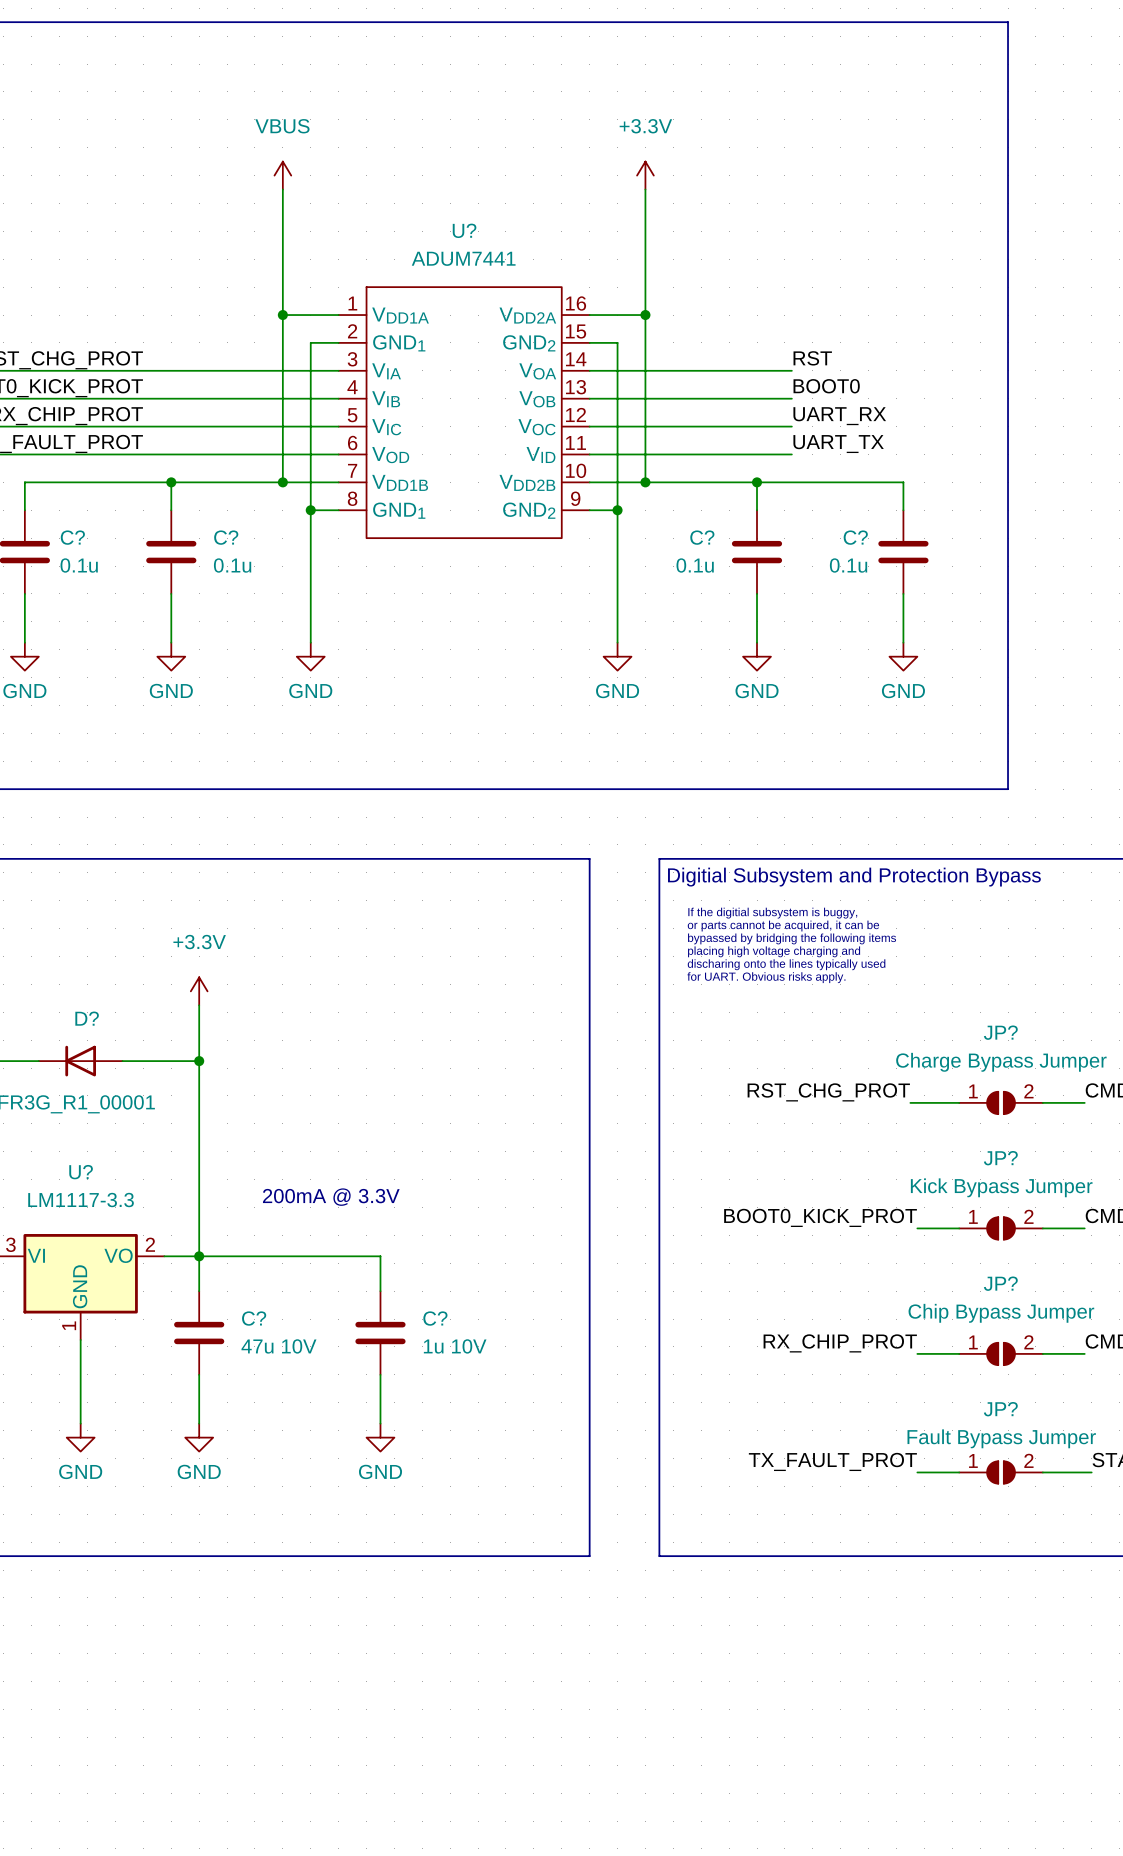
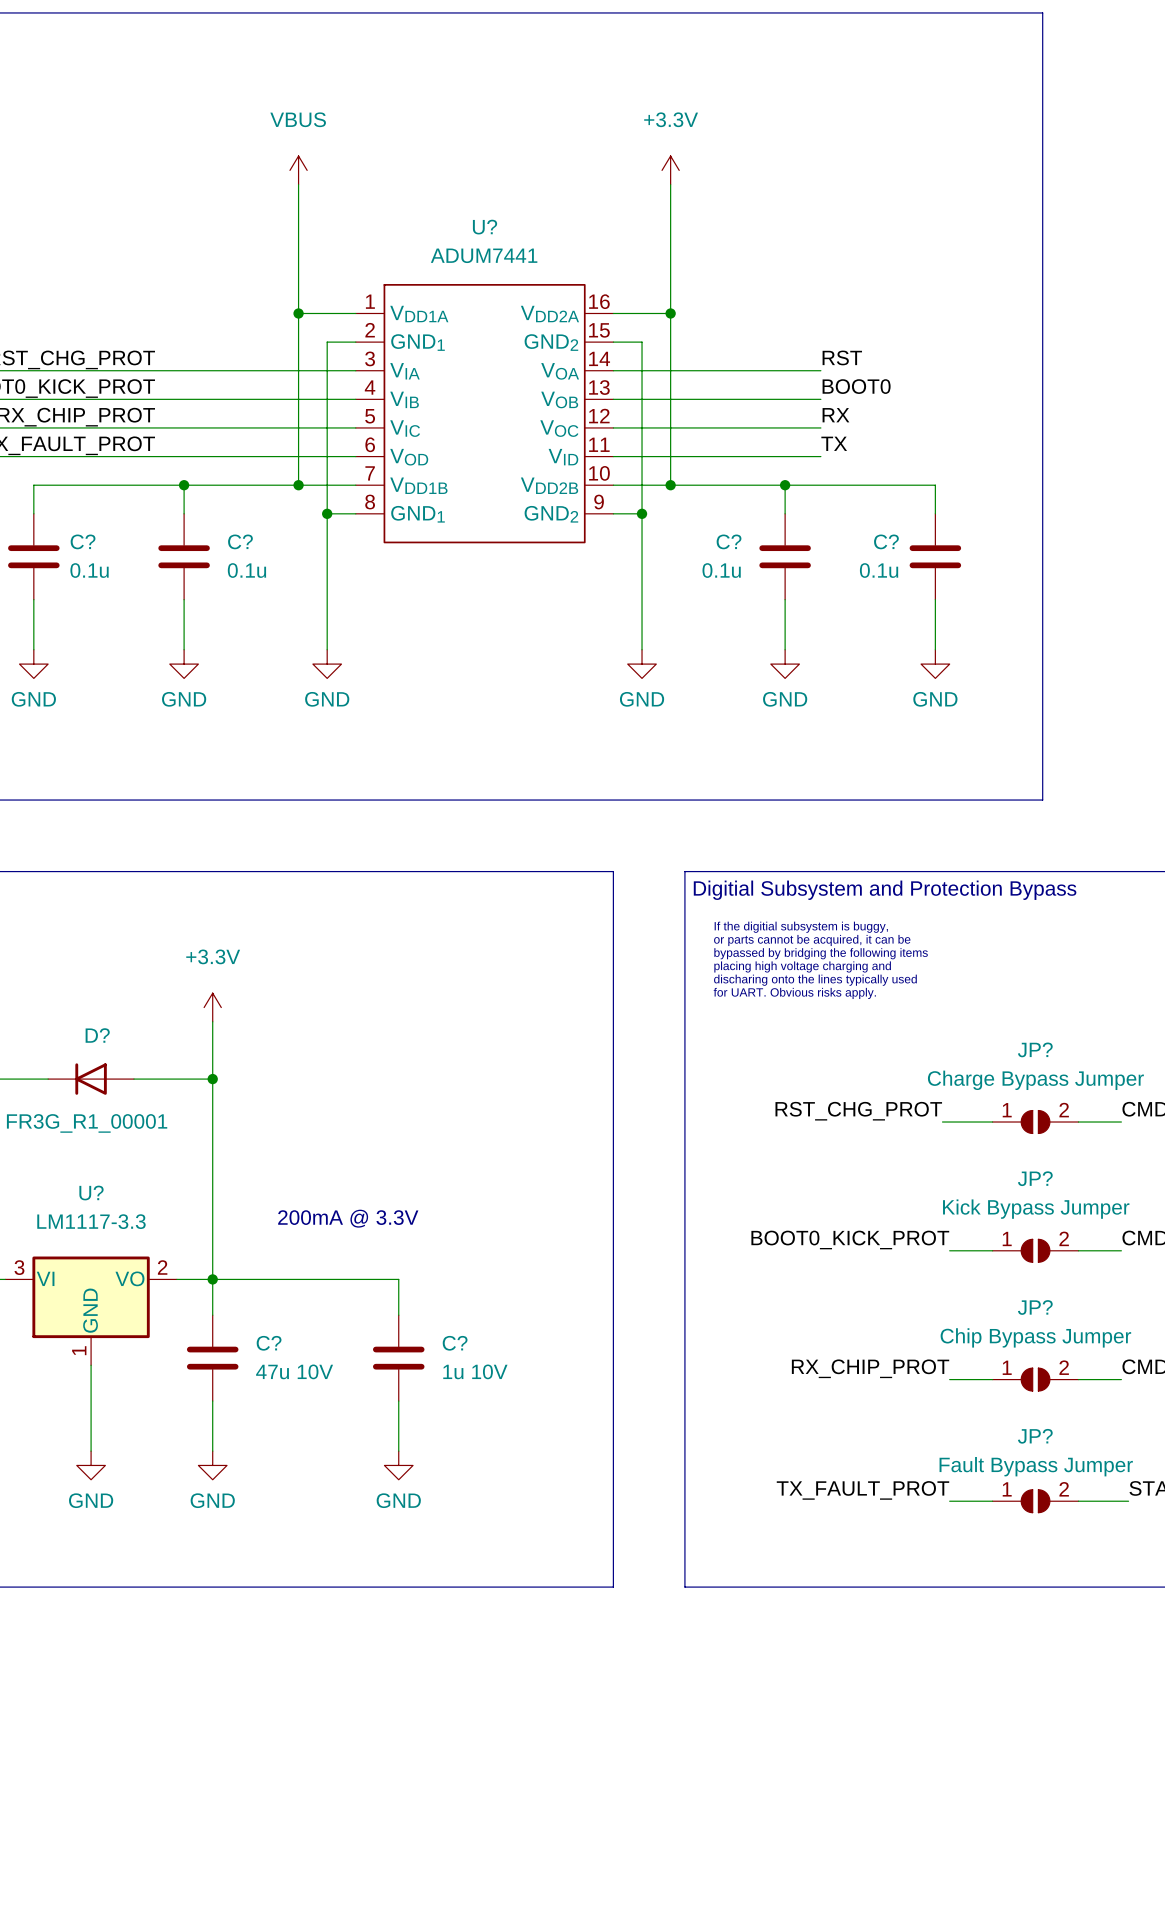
label: UART_RX (839, 416) -> RX (835, 415)
label: UART_TX (838, 444) -> TX (834, 443)

